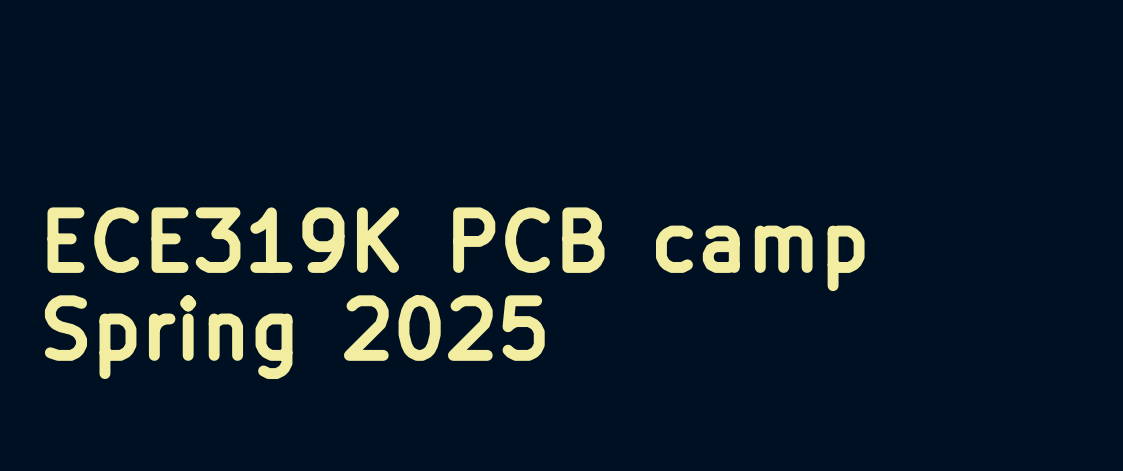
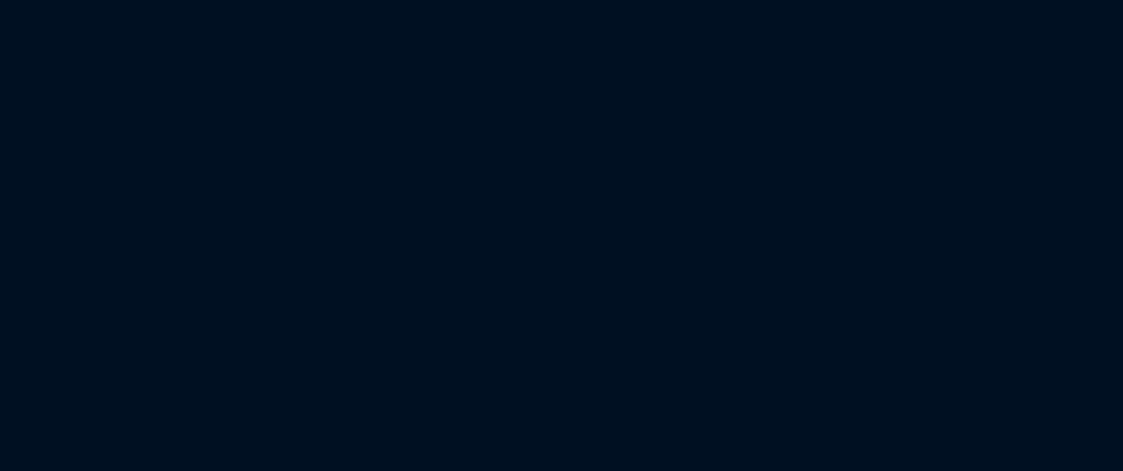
text: ECE319K PCB camp (456, 249) -> none
text: Spring 2025 (294, 337) -> none

